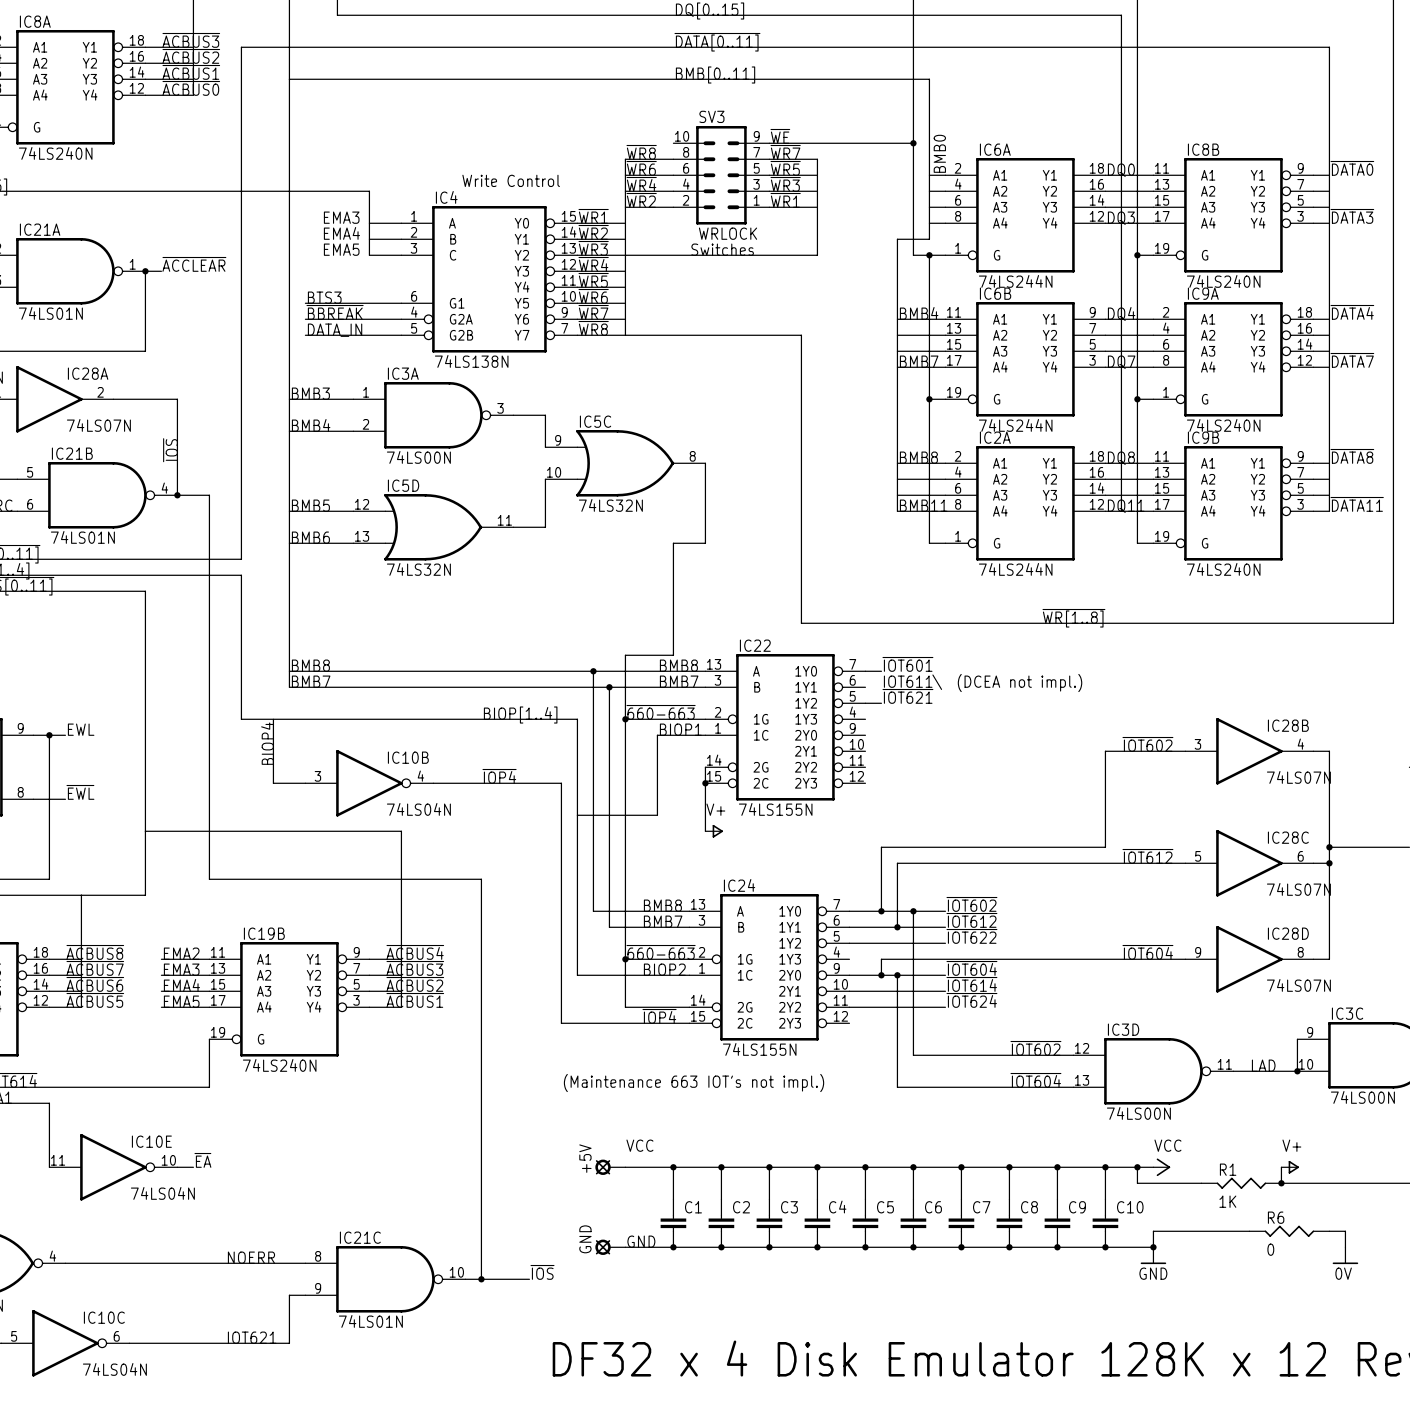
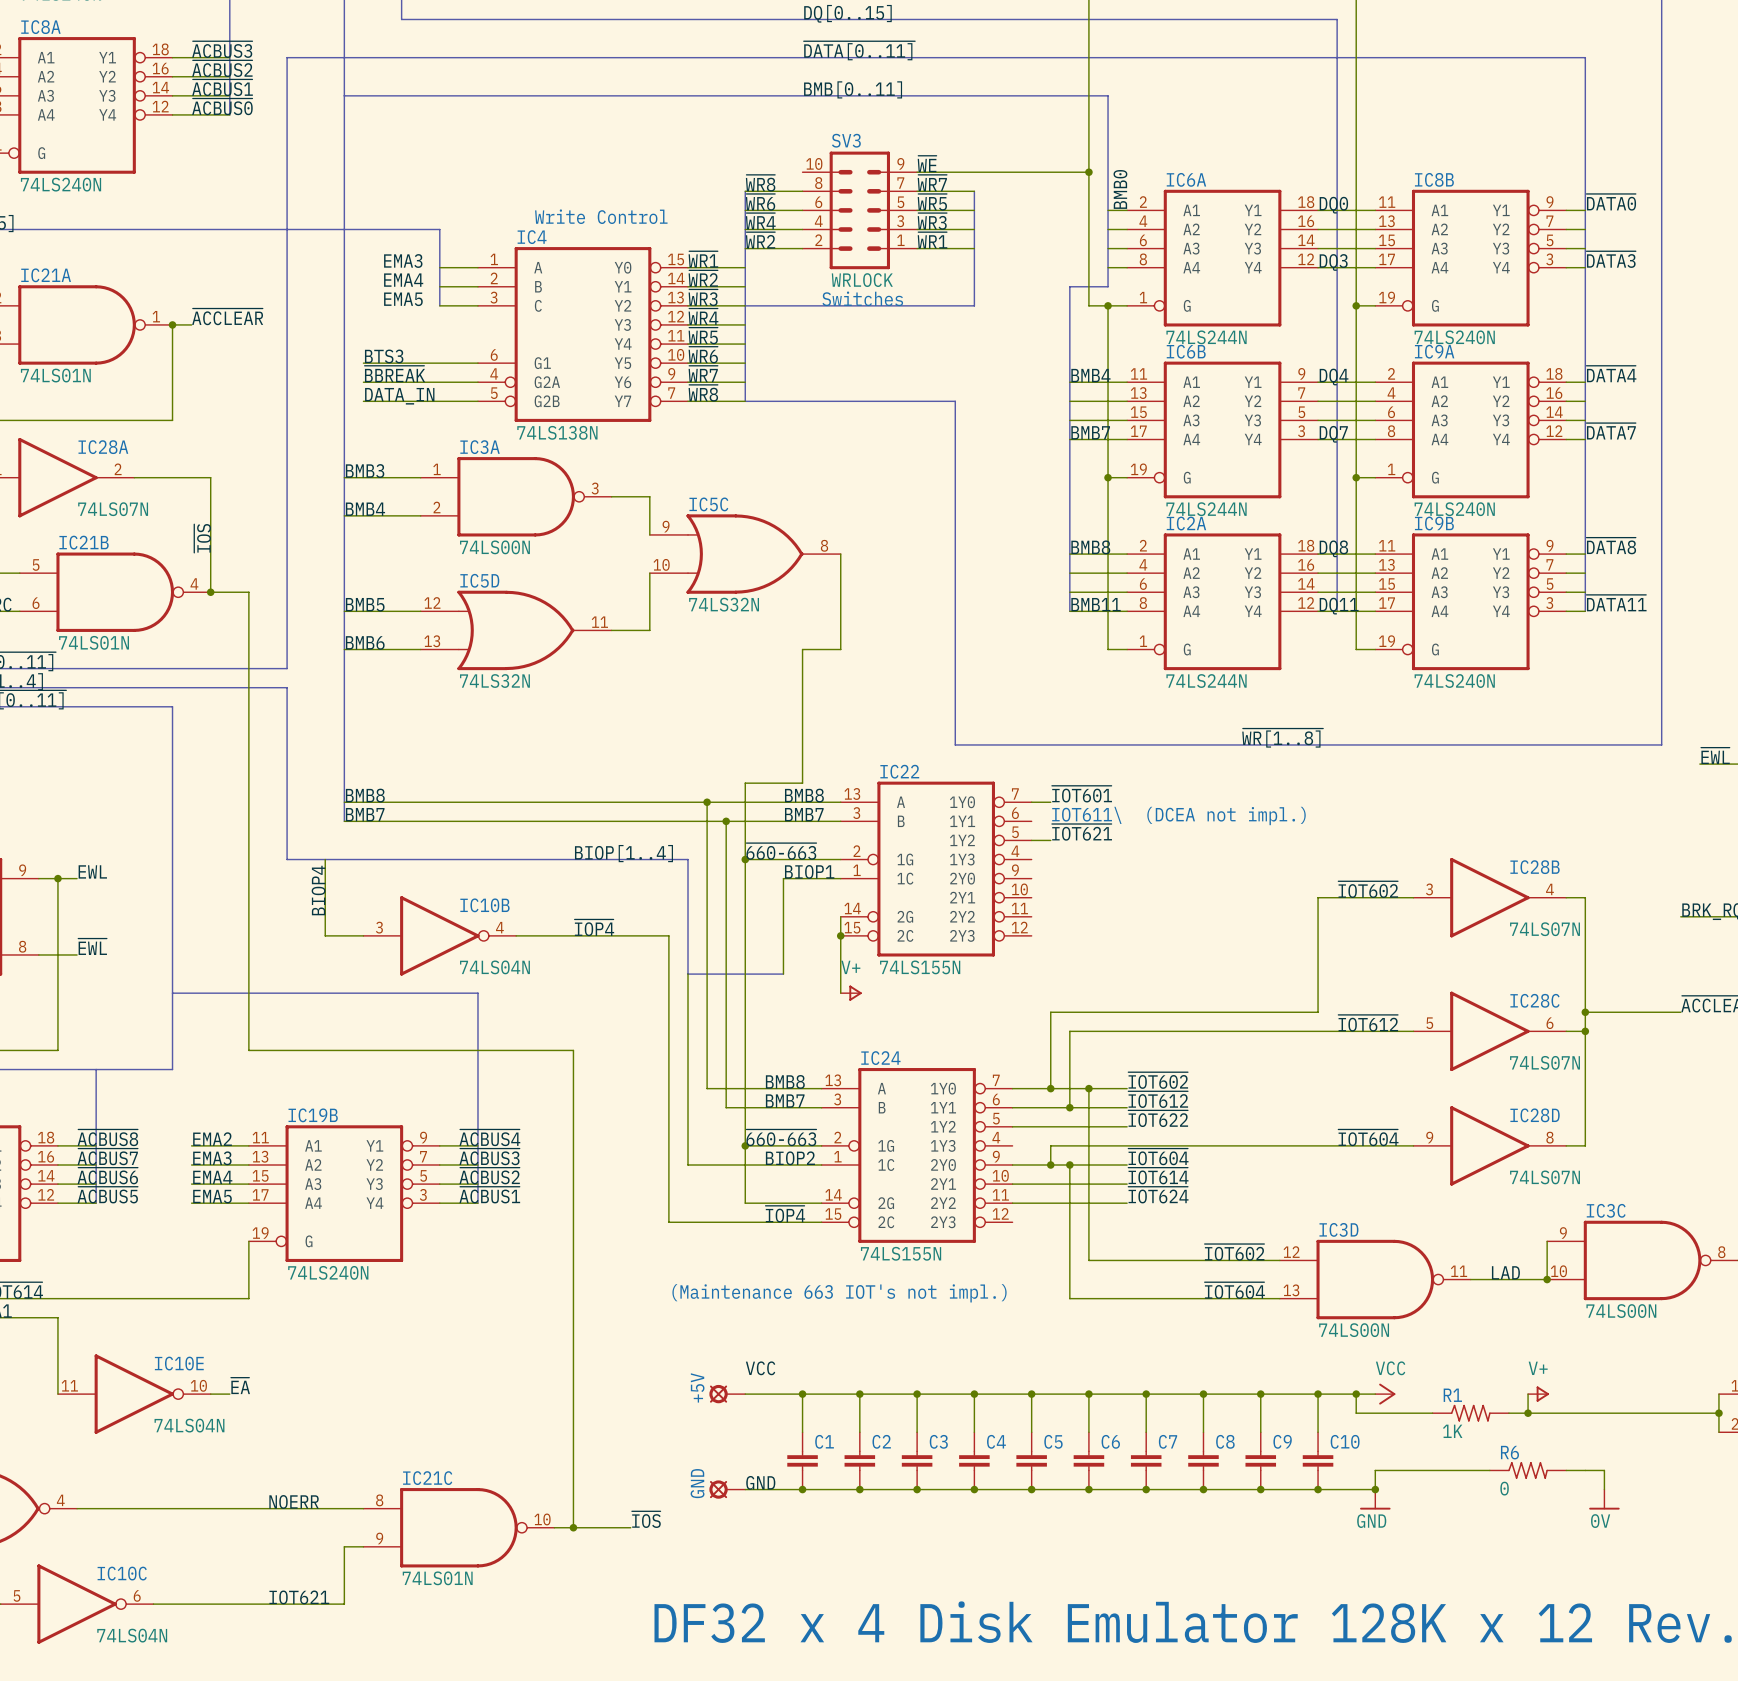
R1 symbol: [1201, 1177, 1282, 1189] -> [1432, 1404, 1509, 1422]
R6 symbol: [1249, 1225, 1330, 1237] -> [1489, 1462, 1567, 1479]

